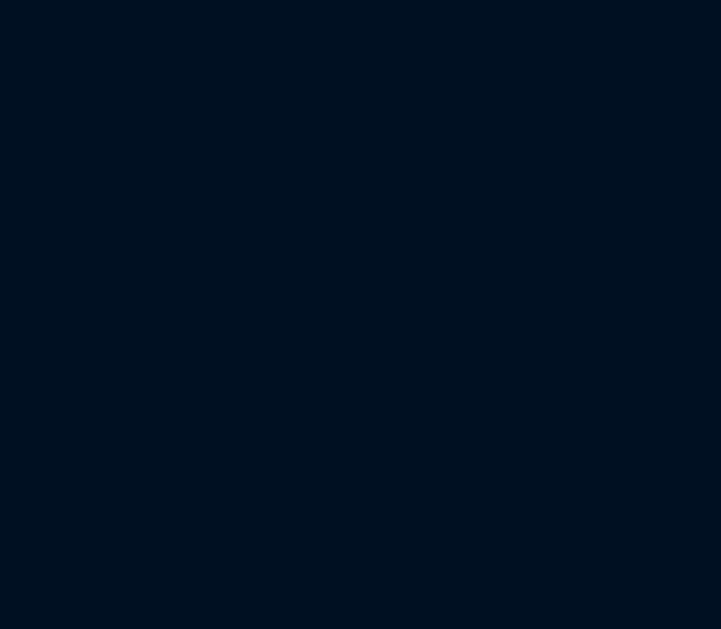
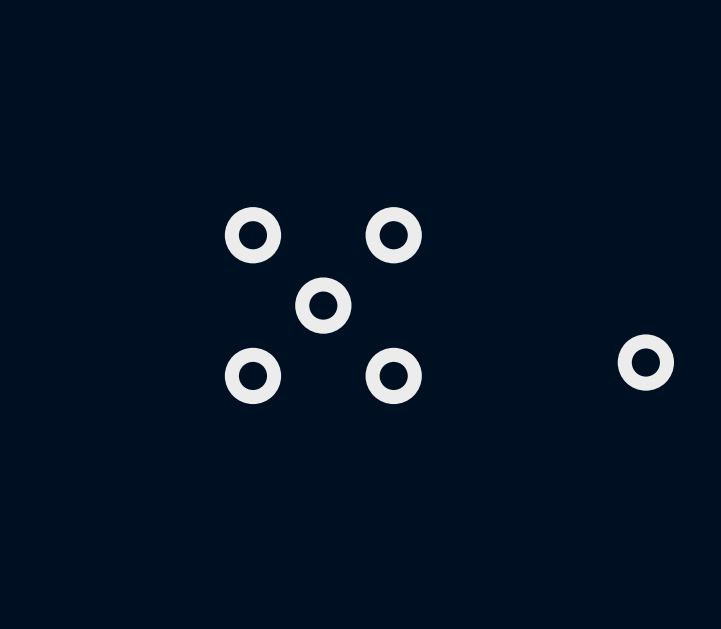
via: none -> (252, 235)
via: none -> (393, 235)
via: none -> (323, 305)
via: none -> (645, 362)
via: none -> (252, 375)
via: none -> (393, 375)

